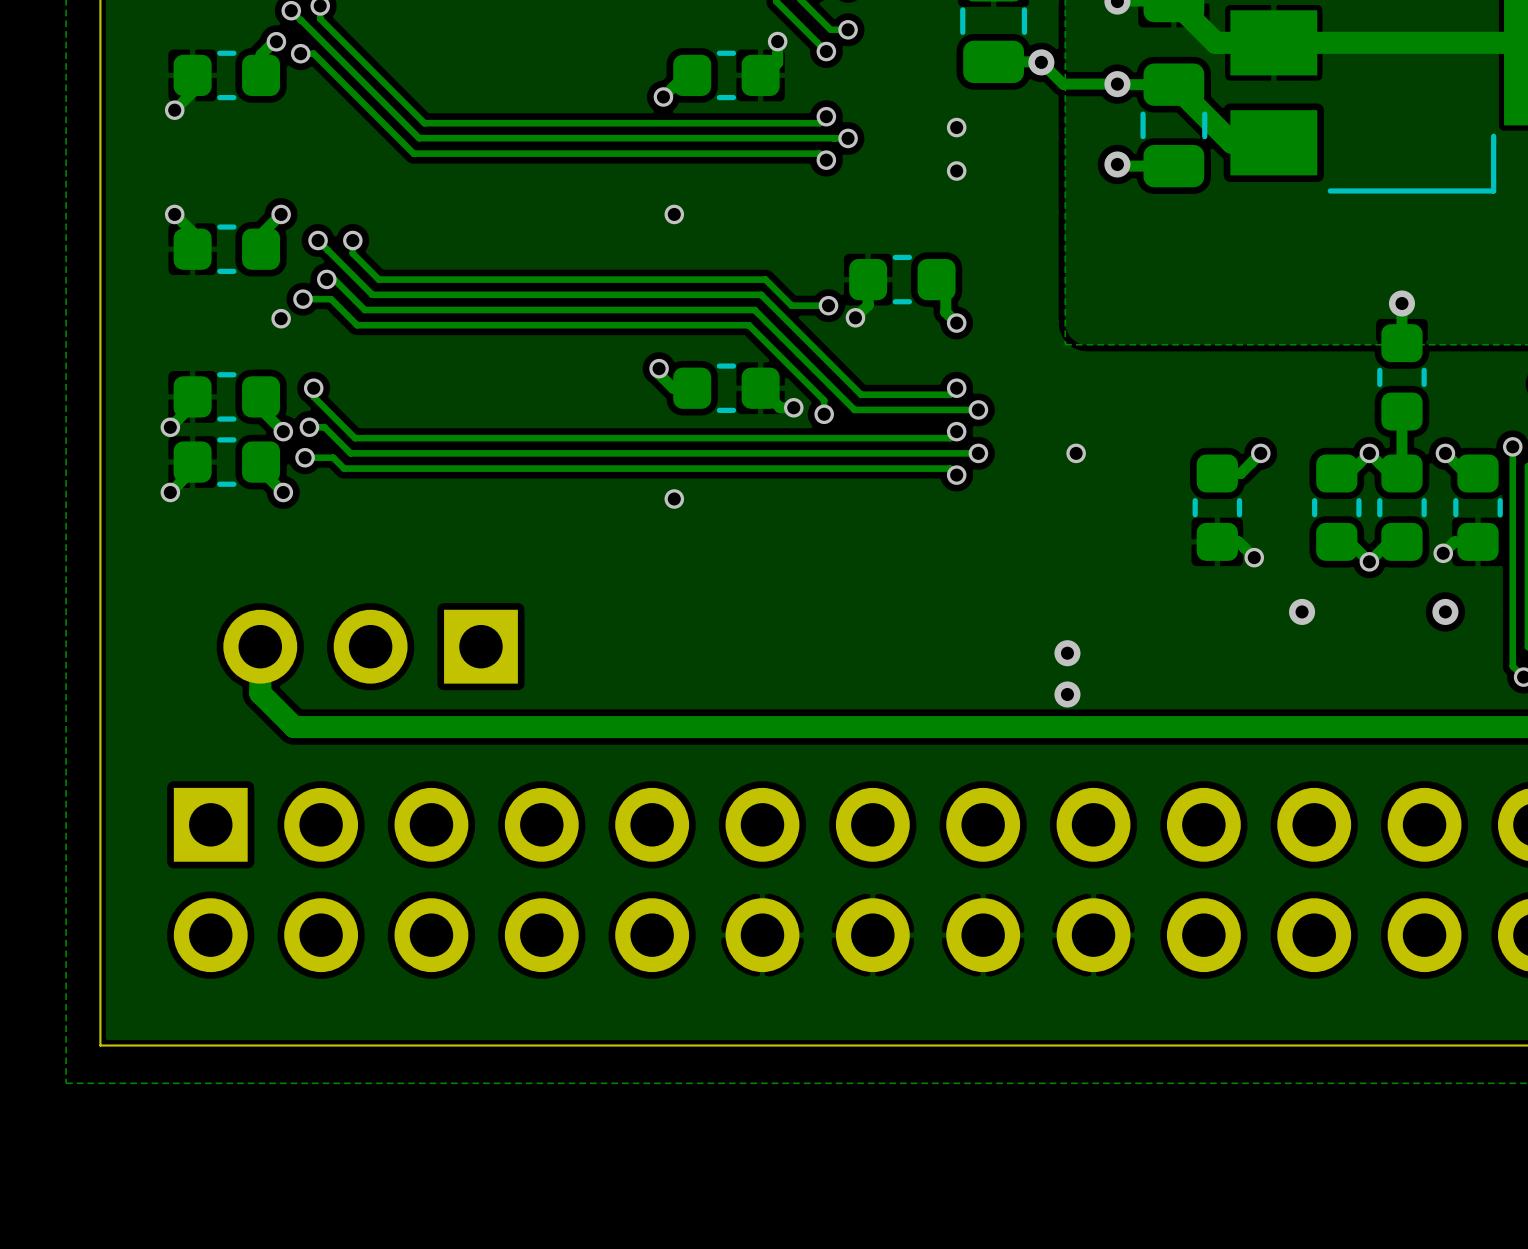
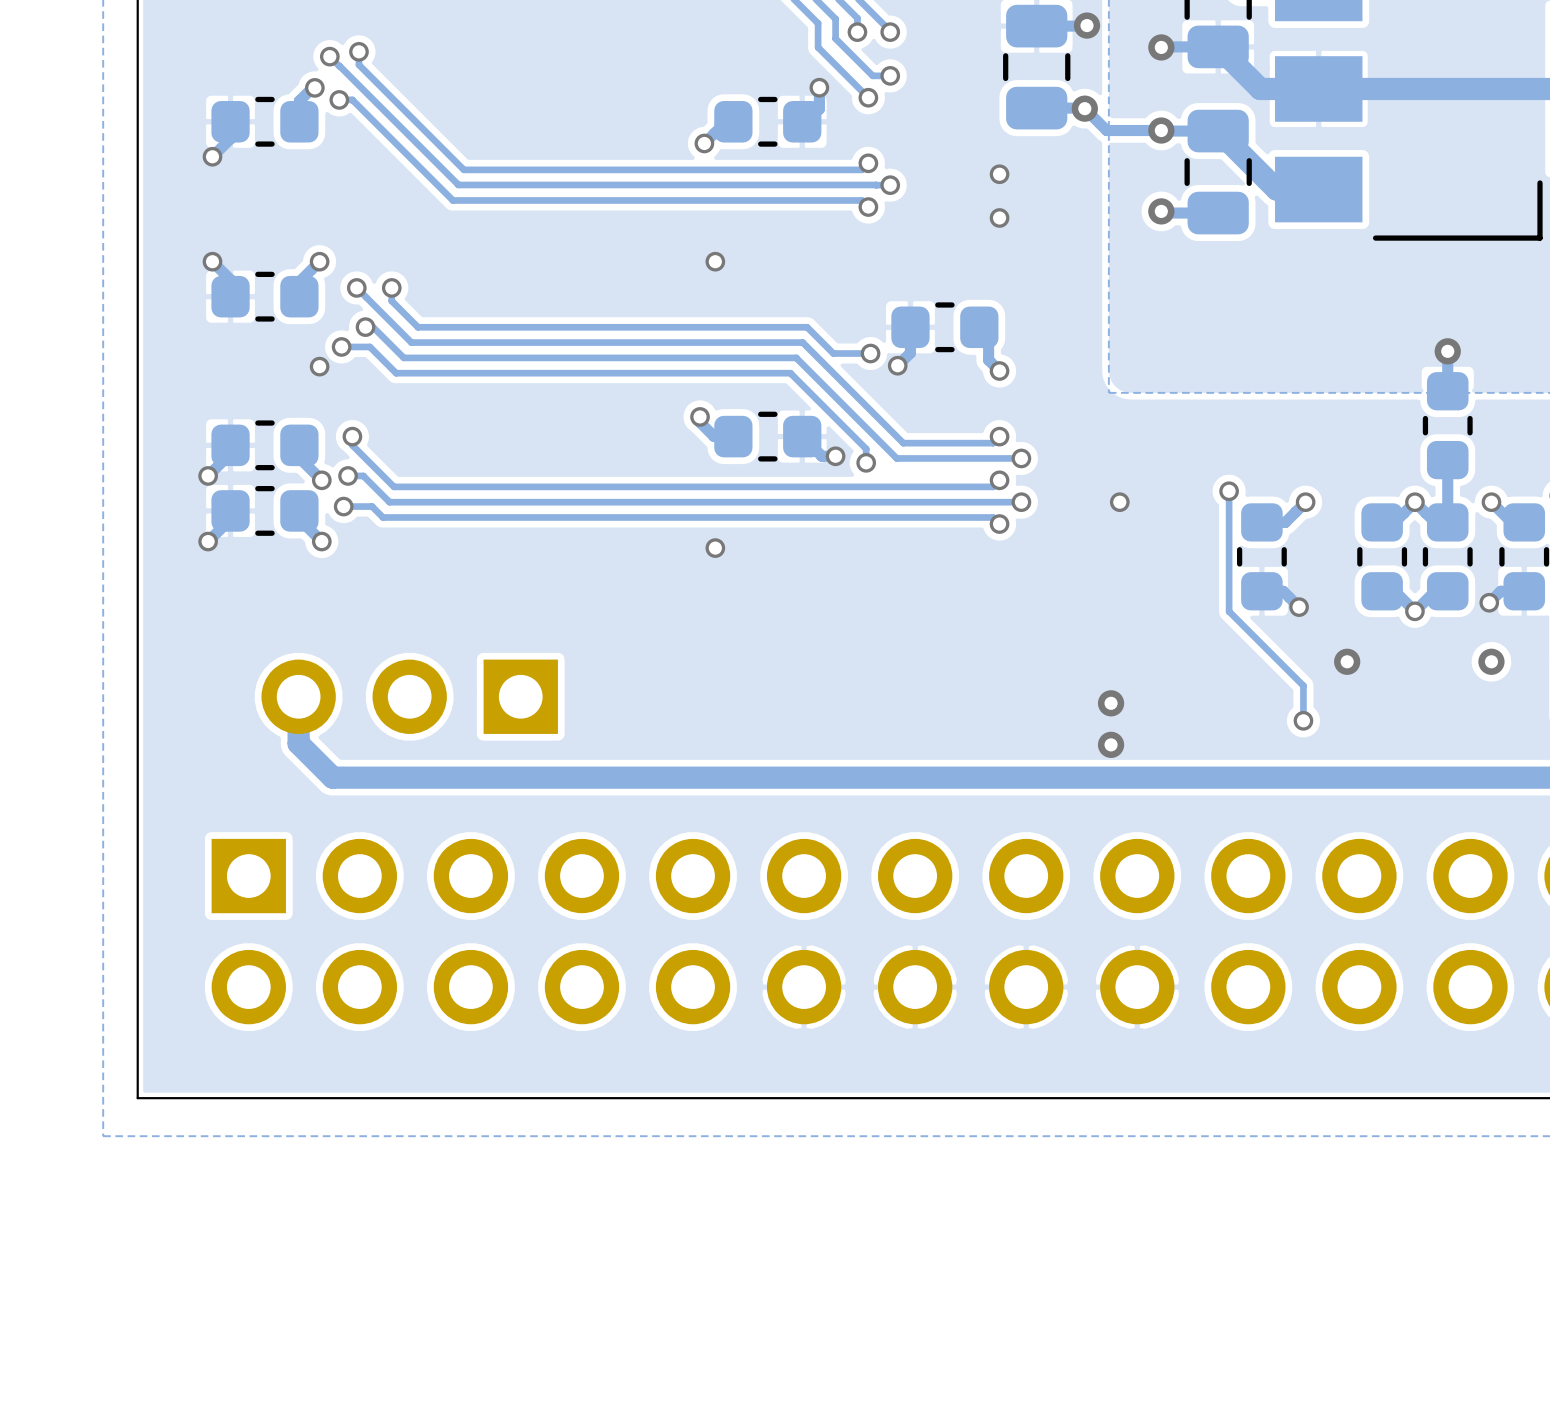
track: none -> (1229, 491) (1229, 611) (1303, 685) (1303, 720)
via: none -> (1229, 491)
via: none -> (1303, 720)

